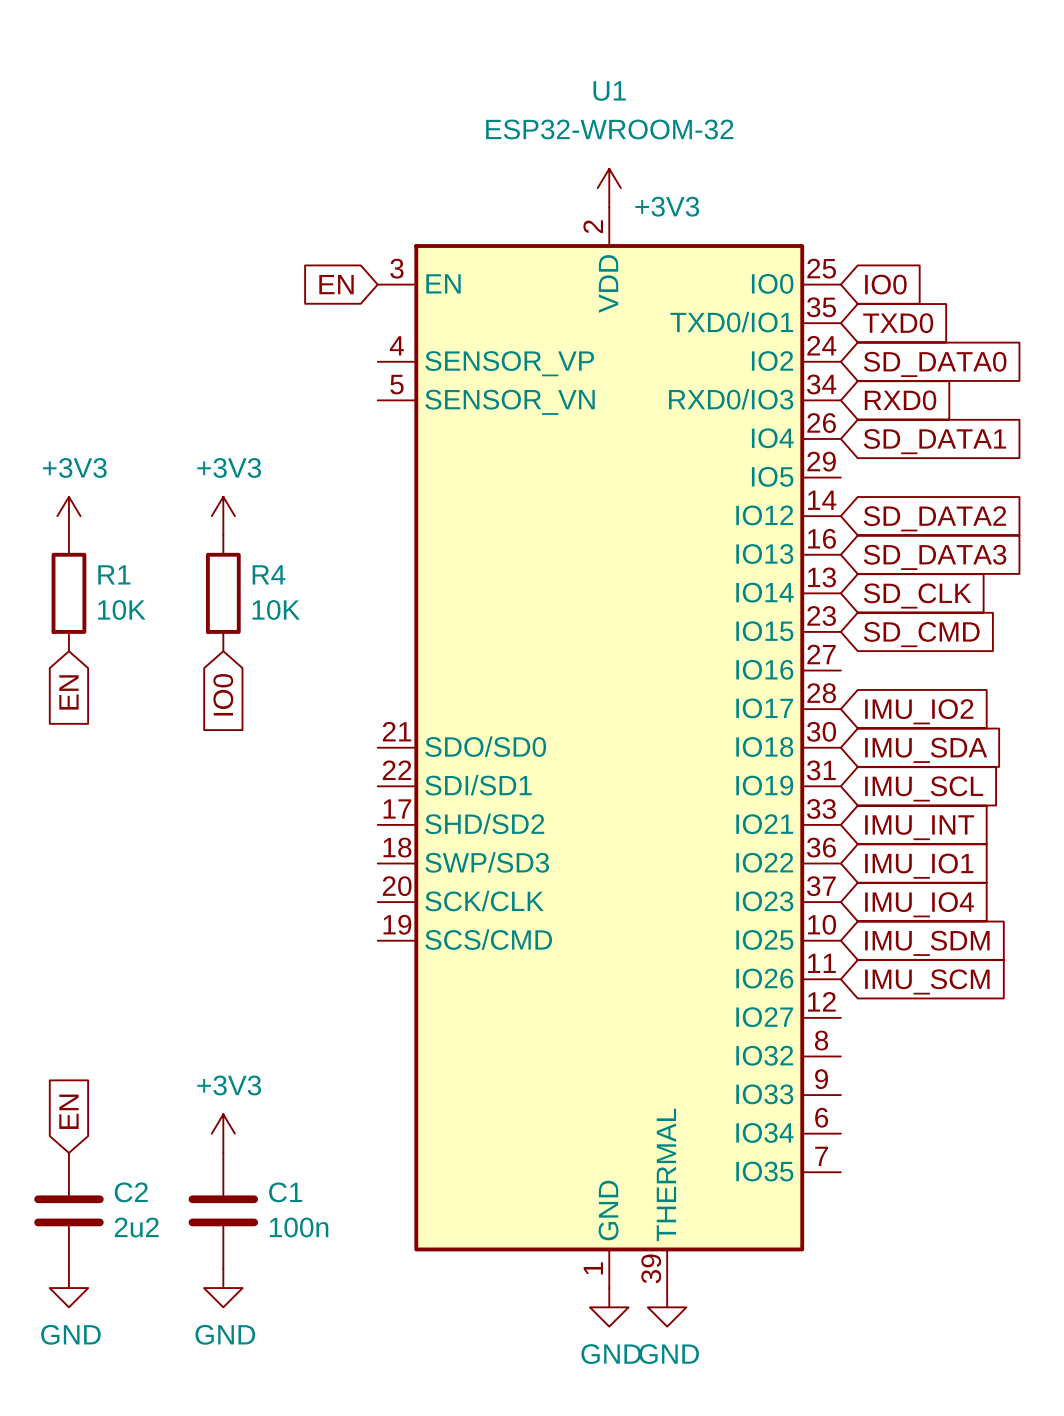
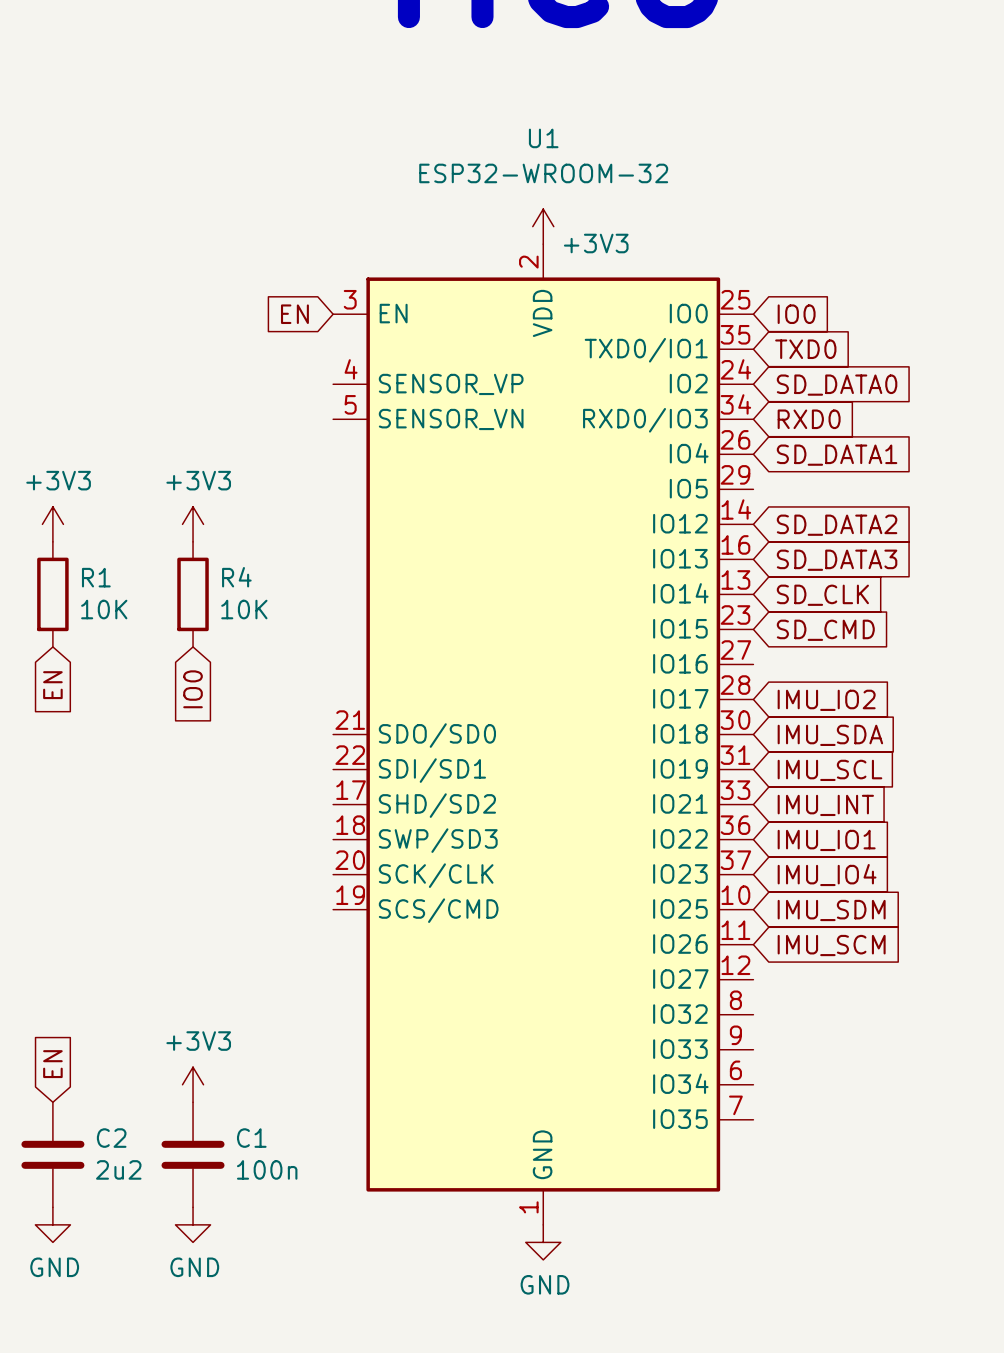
U1 symbol: [377, 207, 841, 1289] -> [333, 244, 754, 1225]
power symbol: GND (667, 1307) -> none

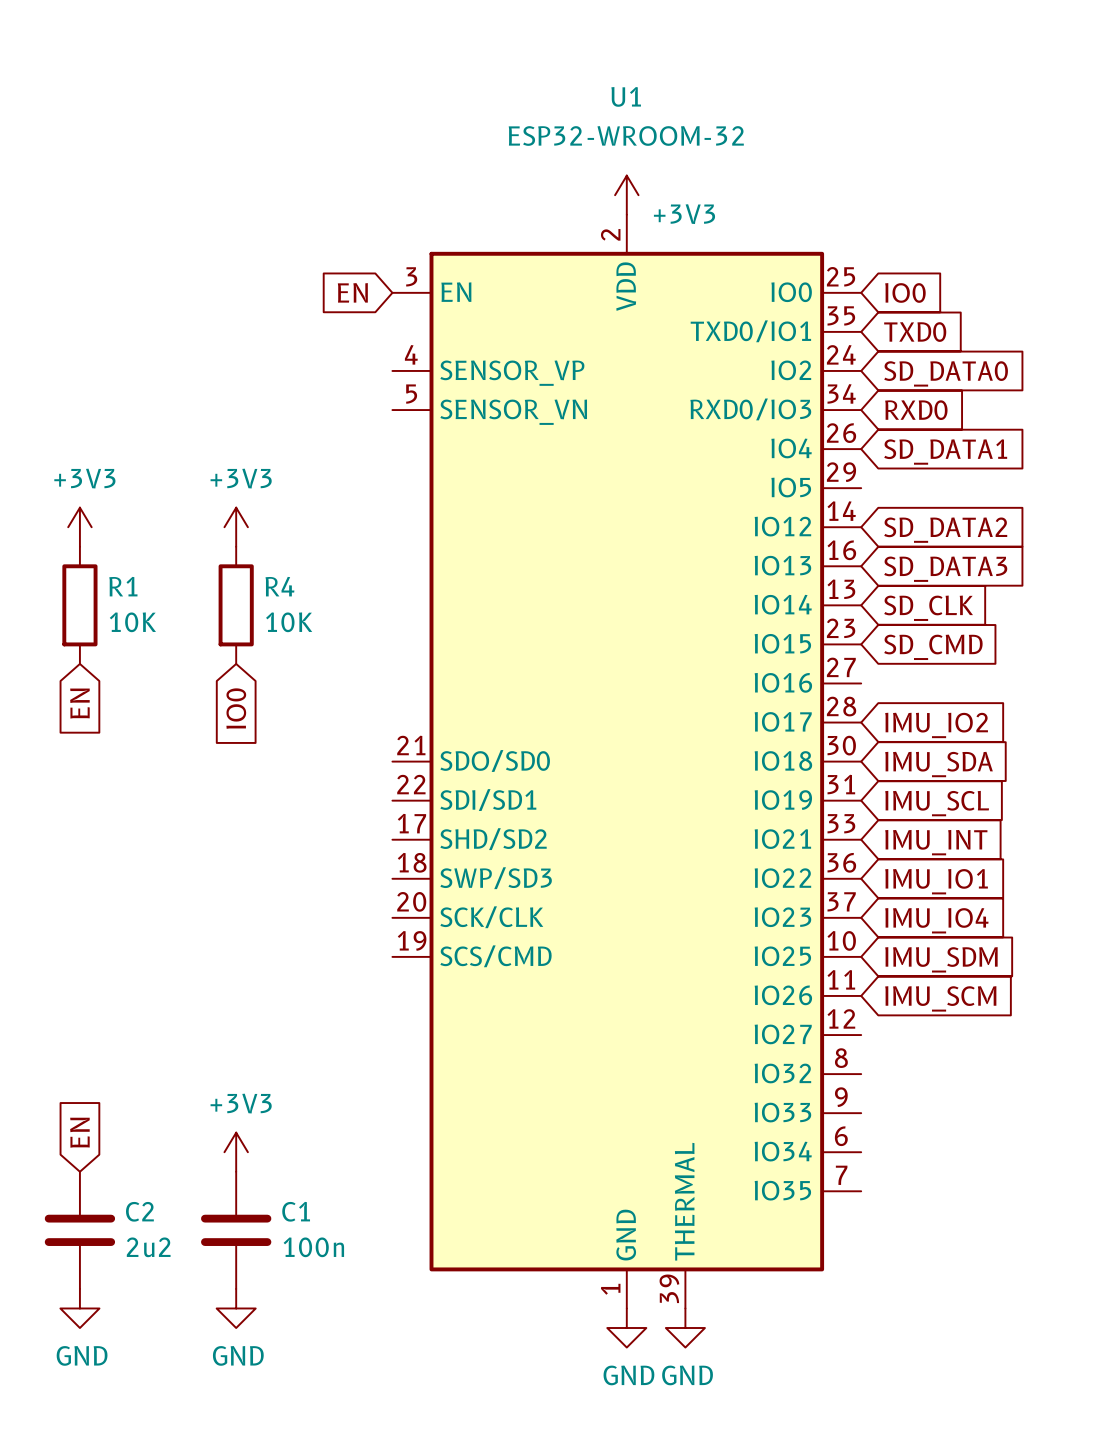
U1 symbol: [333, 244, 754, 1225] -> [392, 214, 862, 1309]
power symbol: none -> GND (685, 1328)

